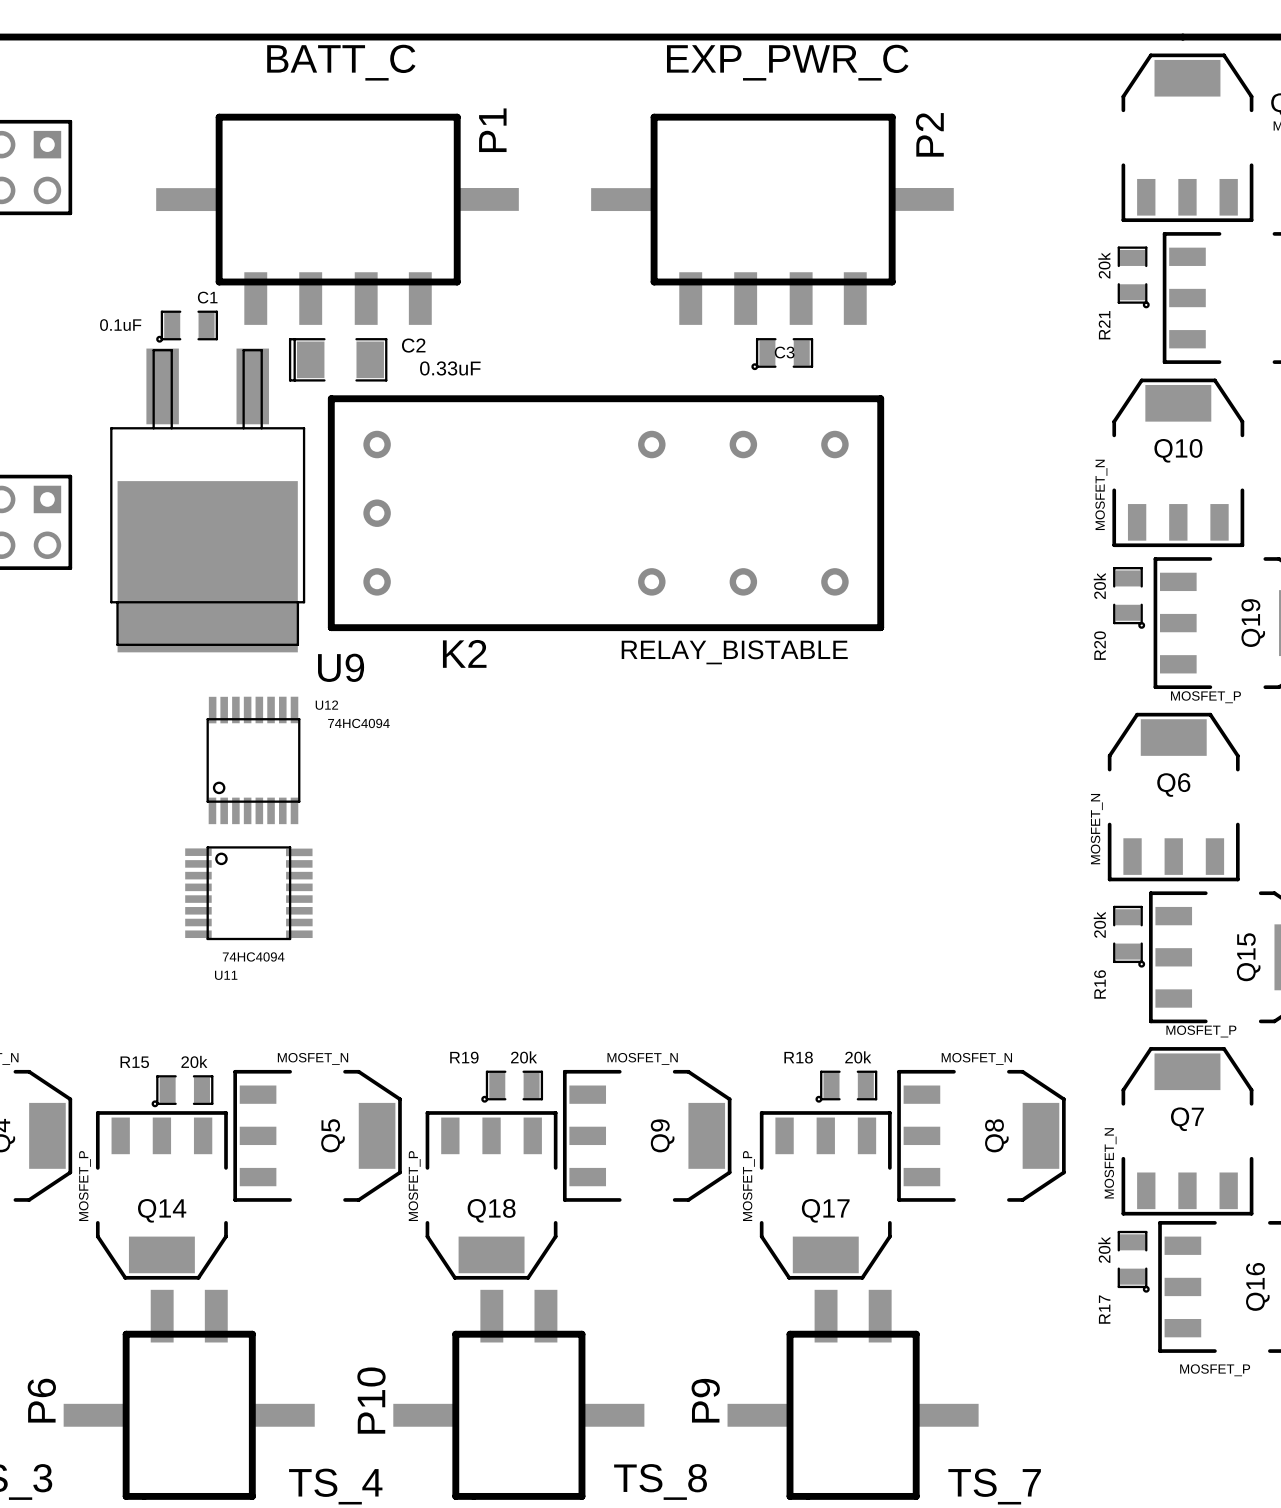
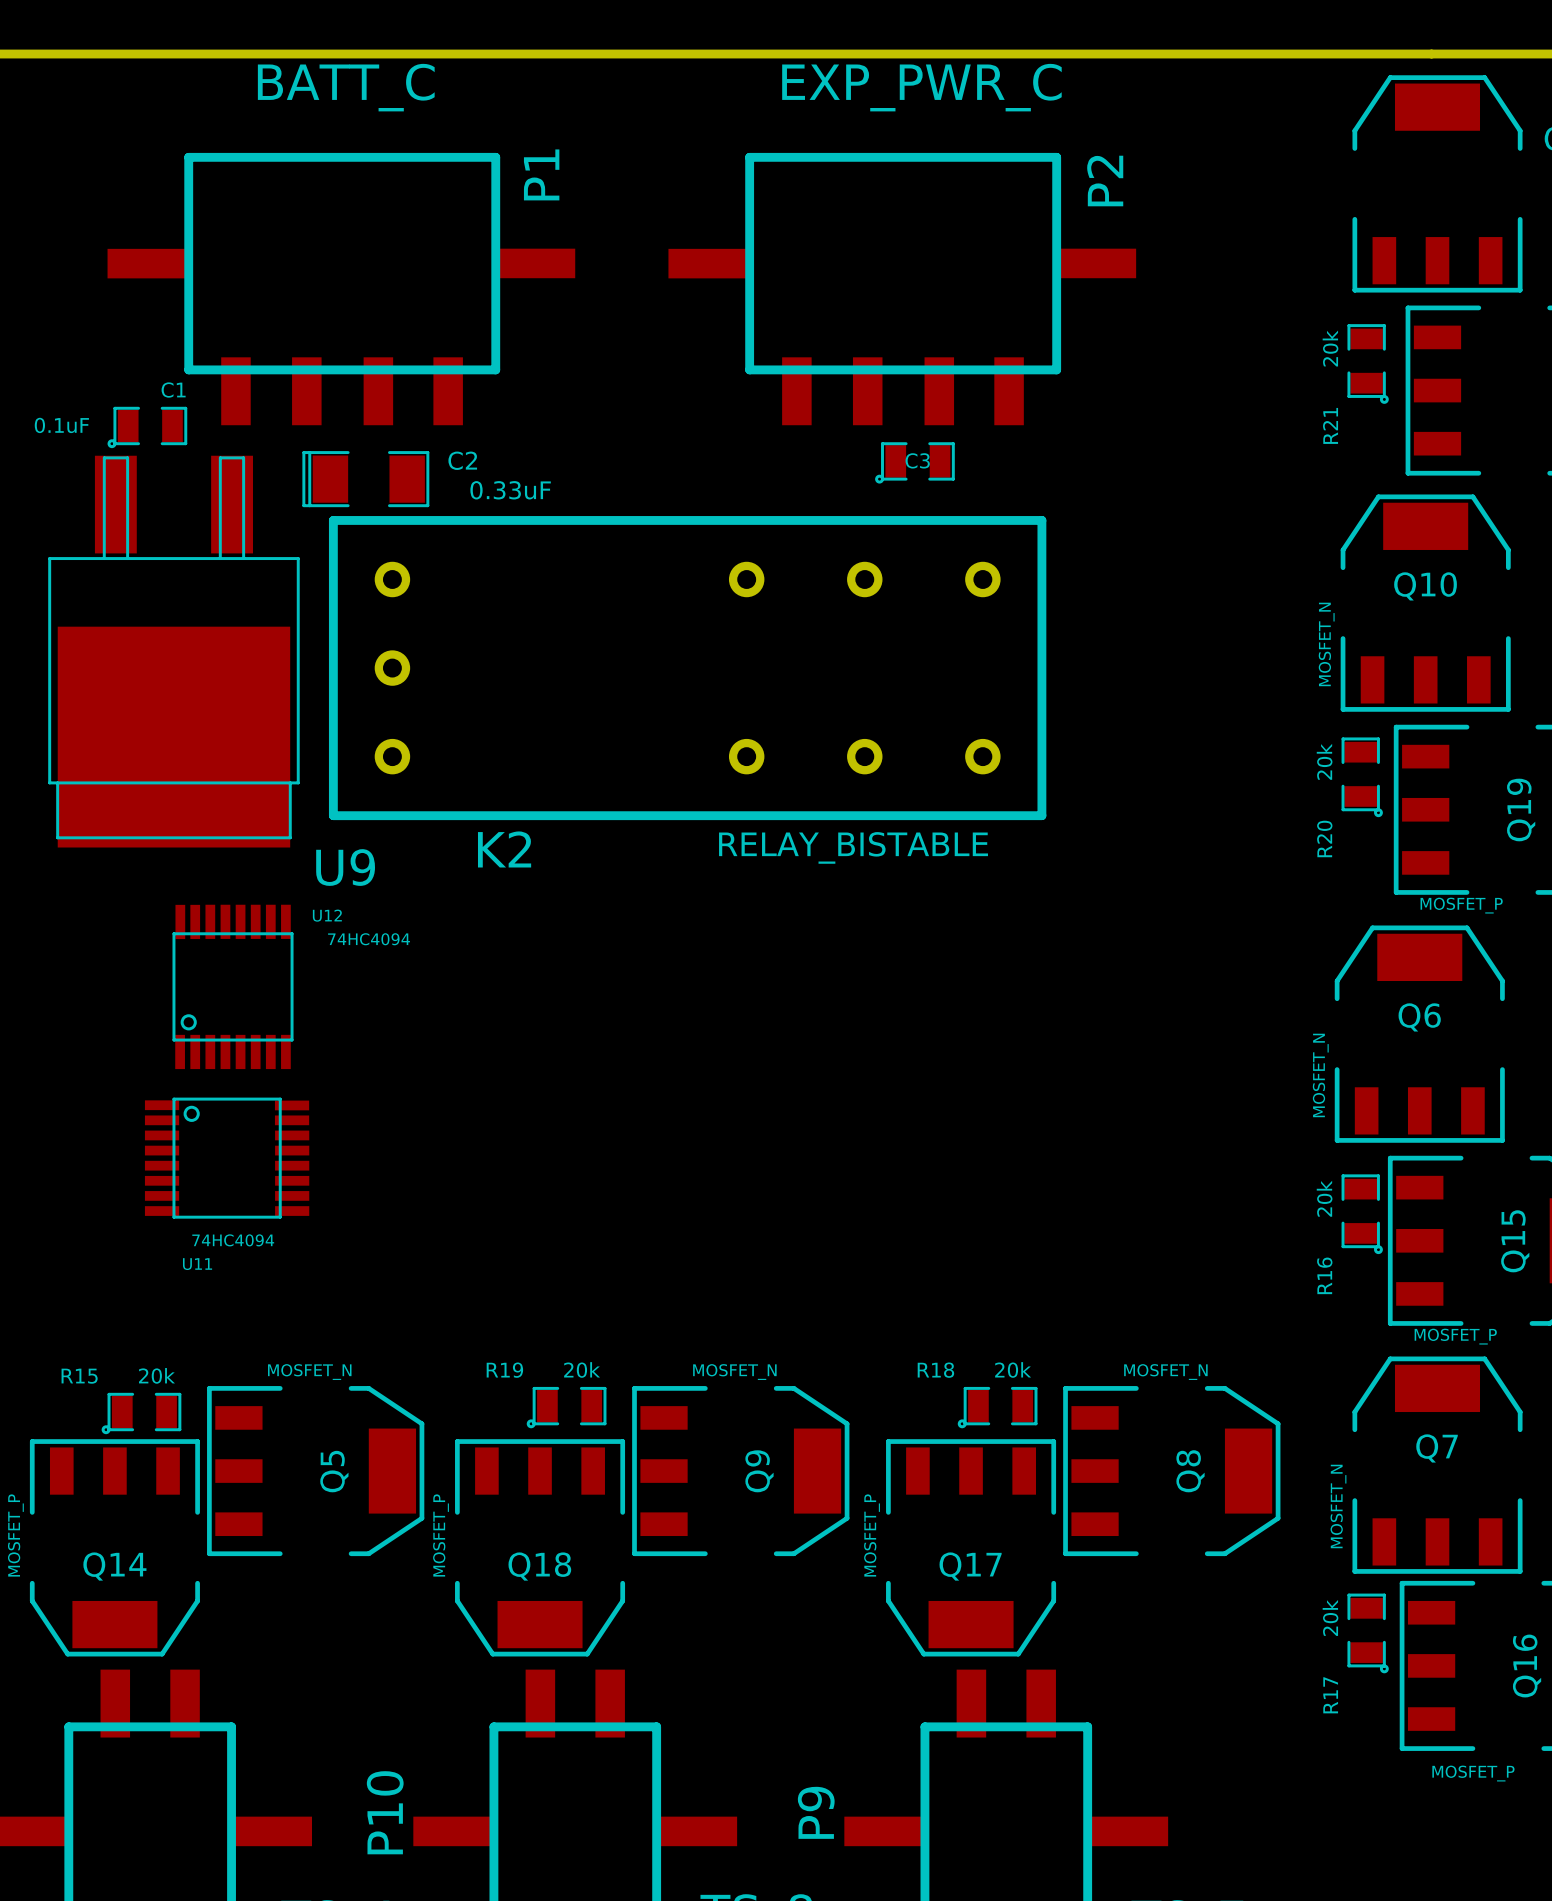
C2 position: (338, 359) -> (365, 479)

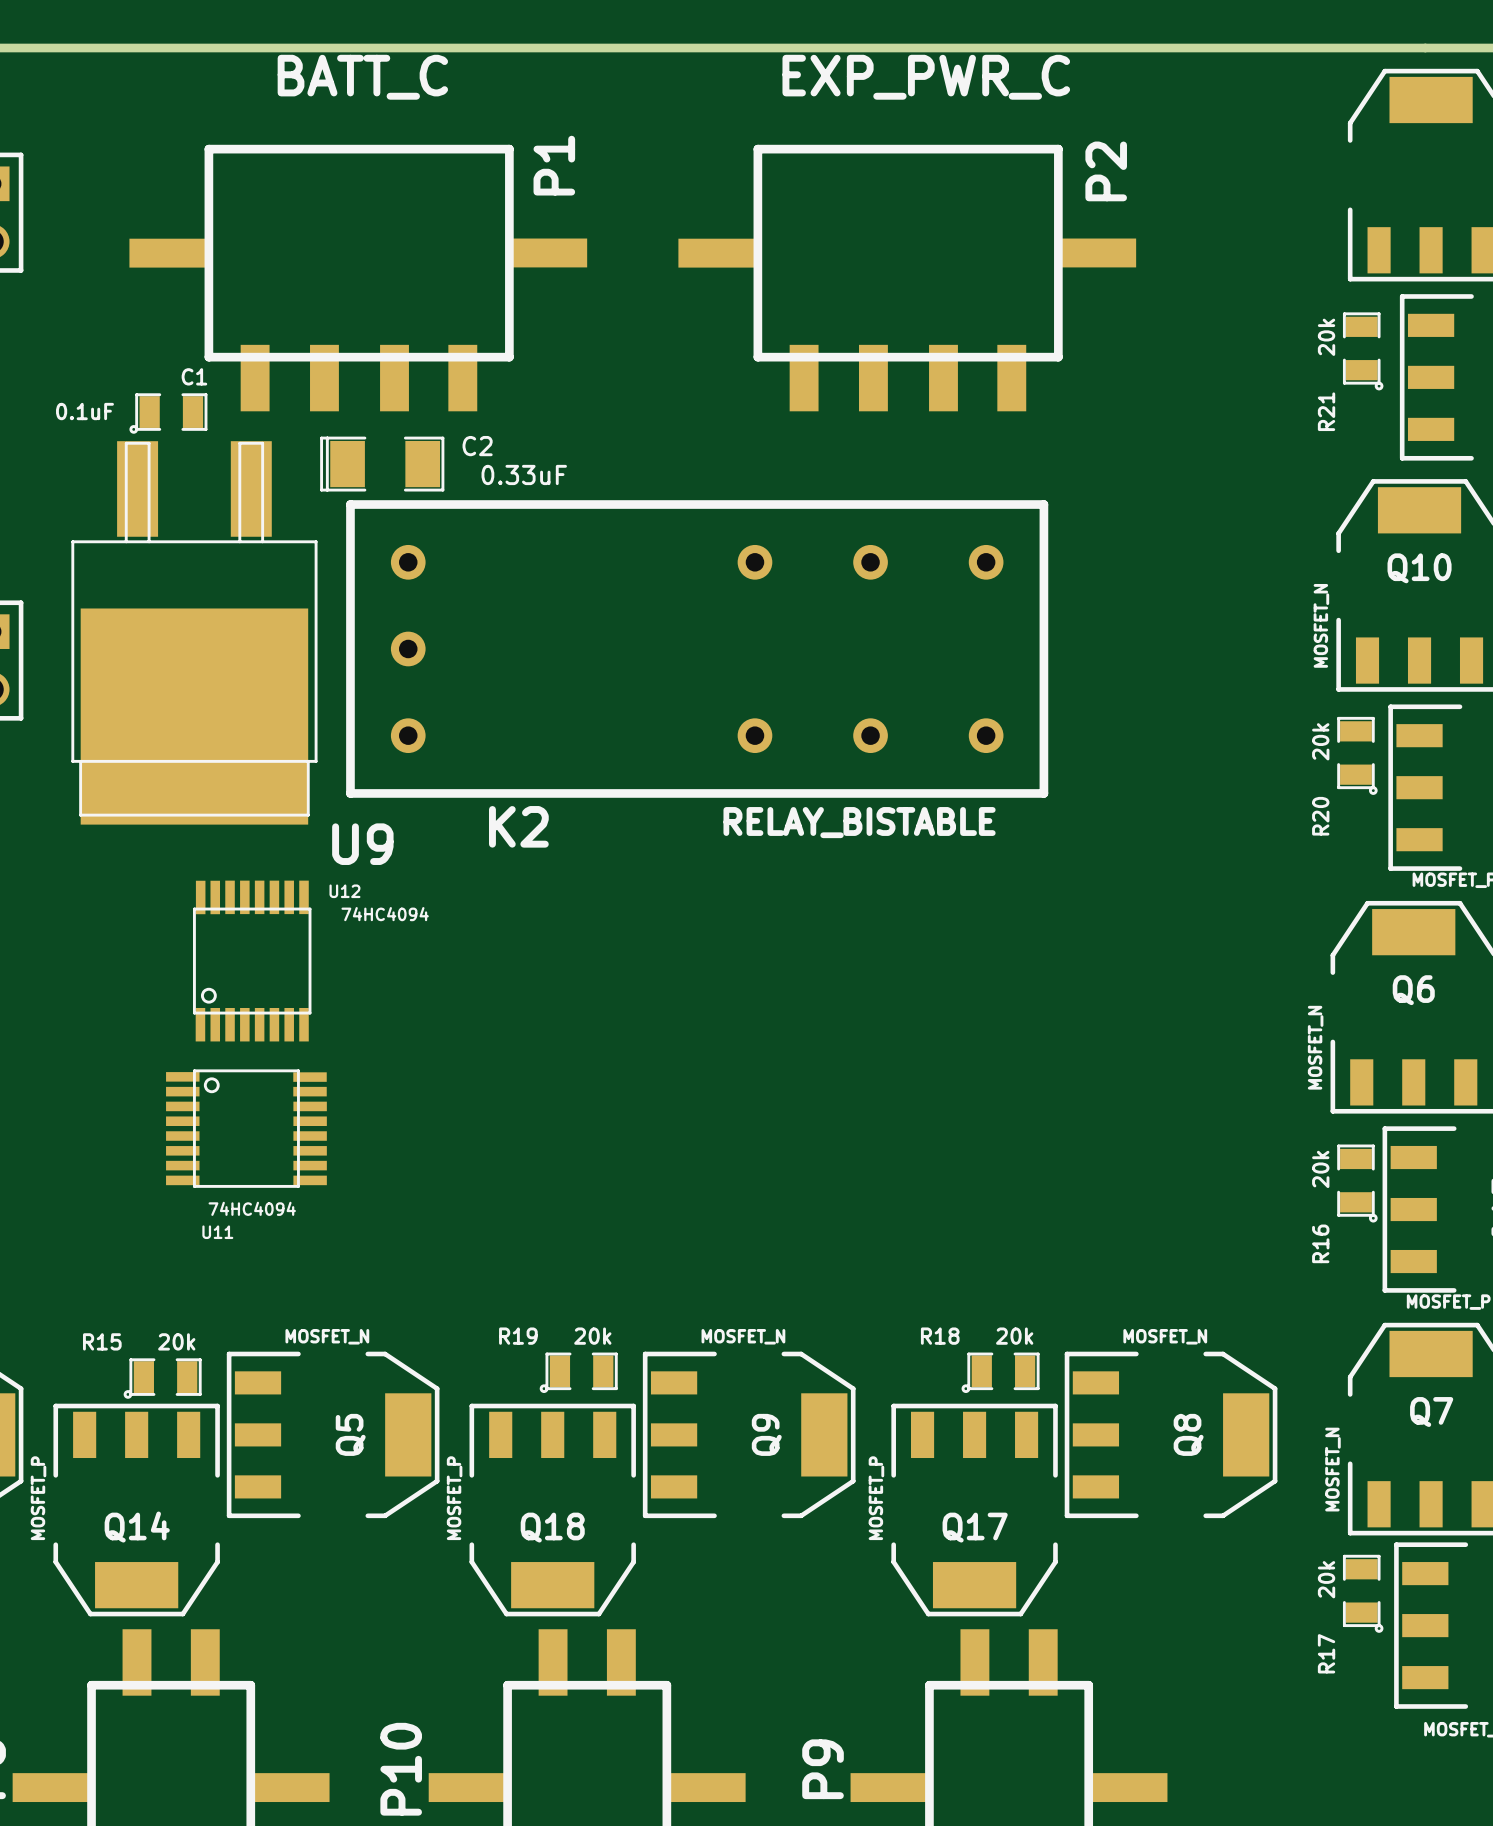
C3: (914, 462) -> none

